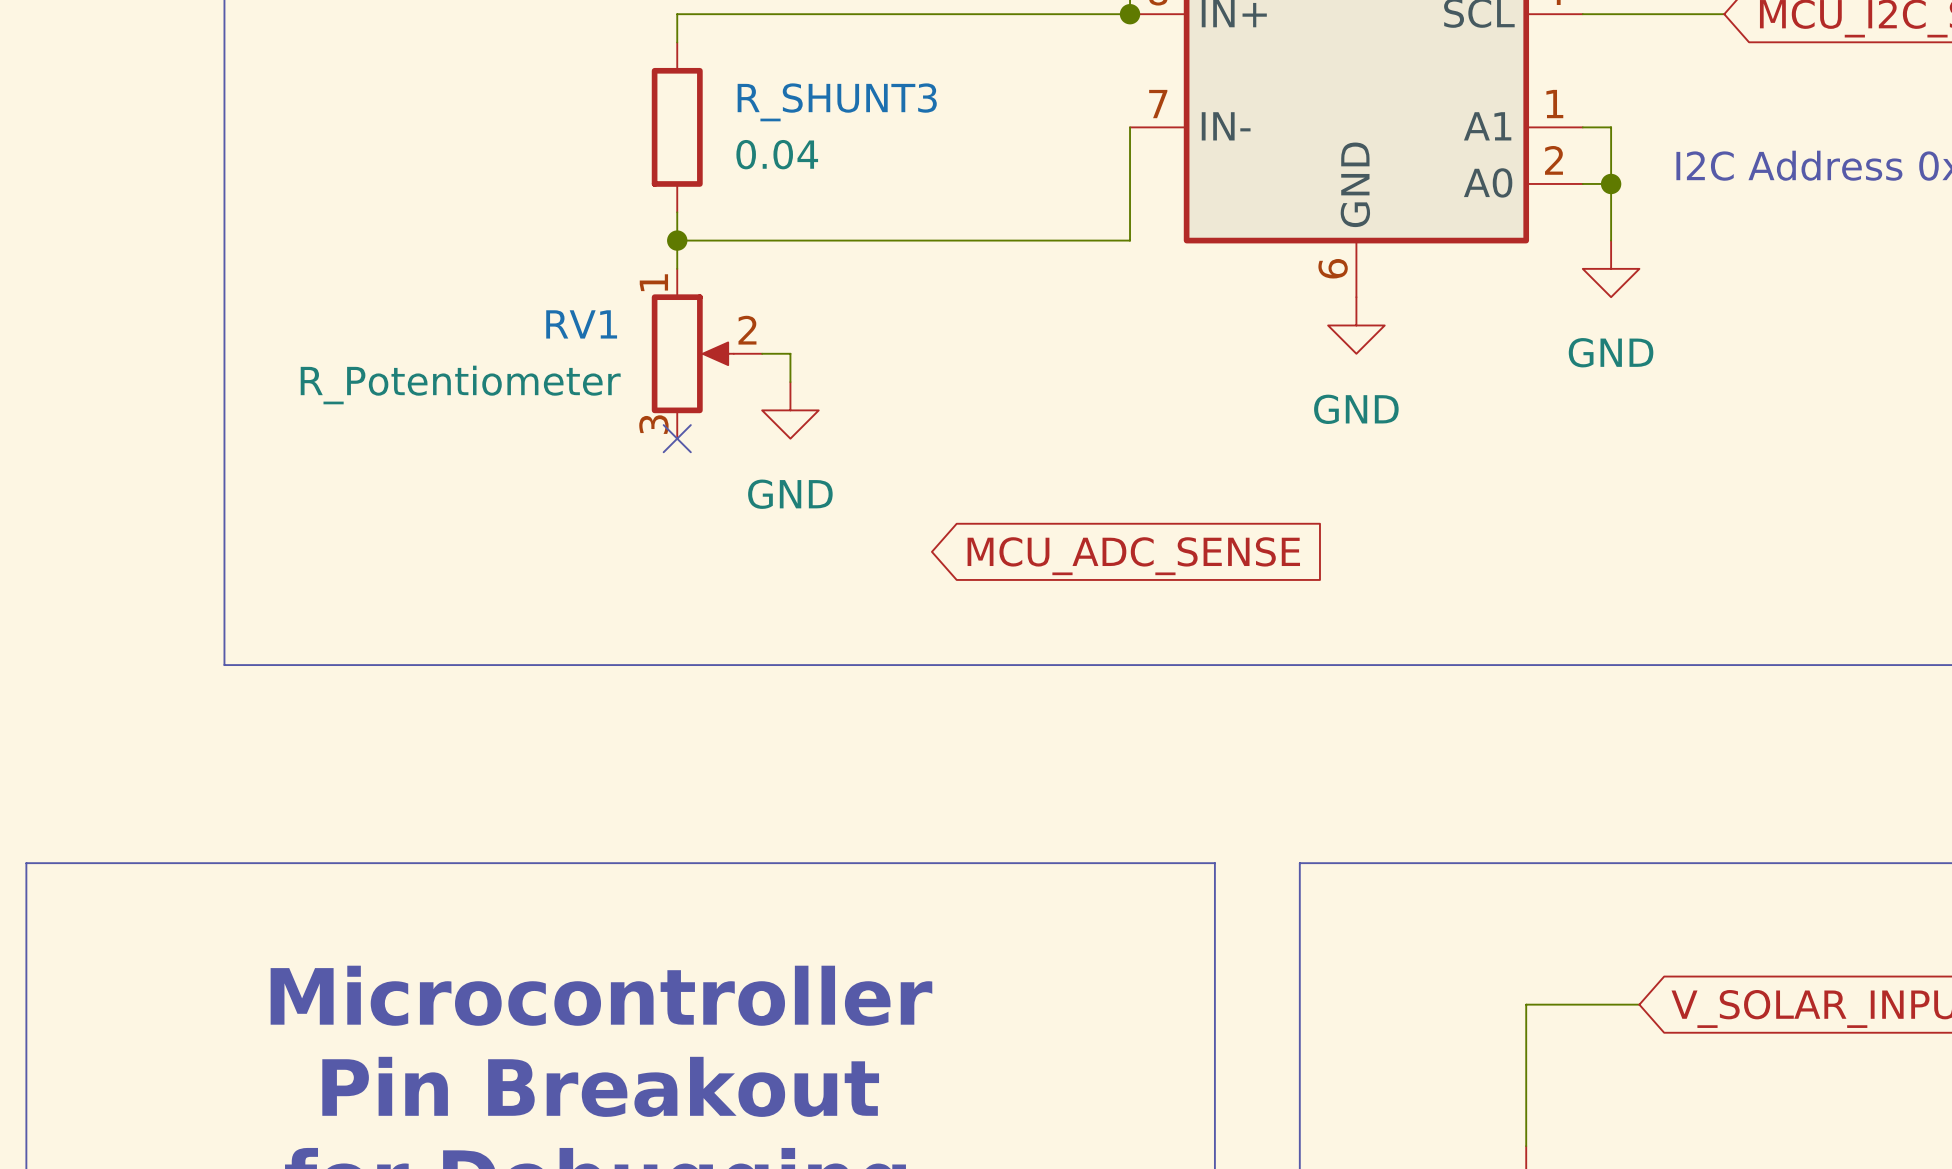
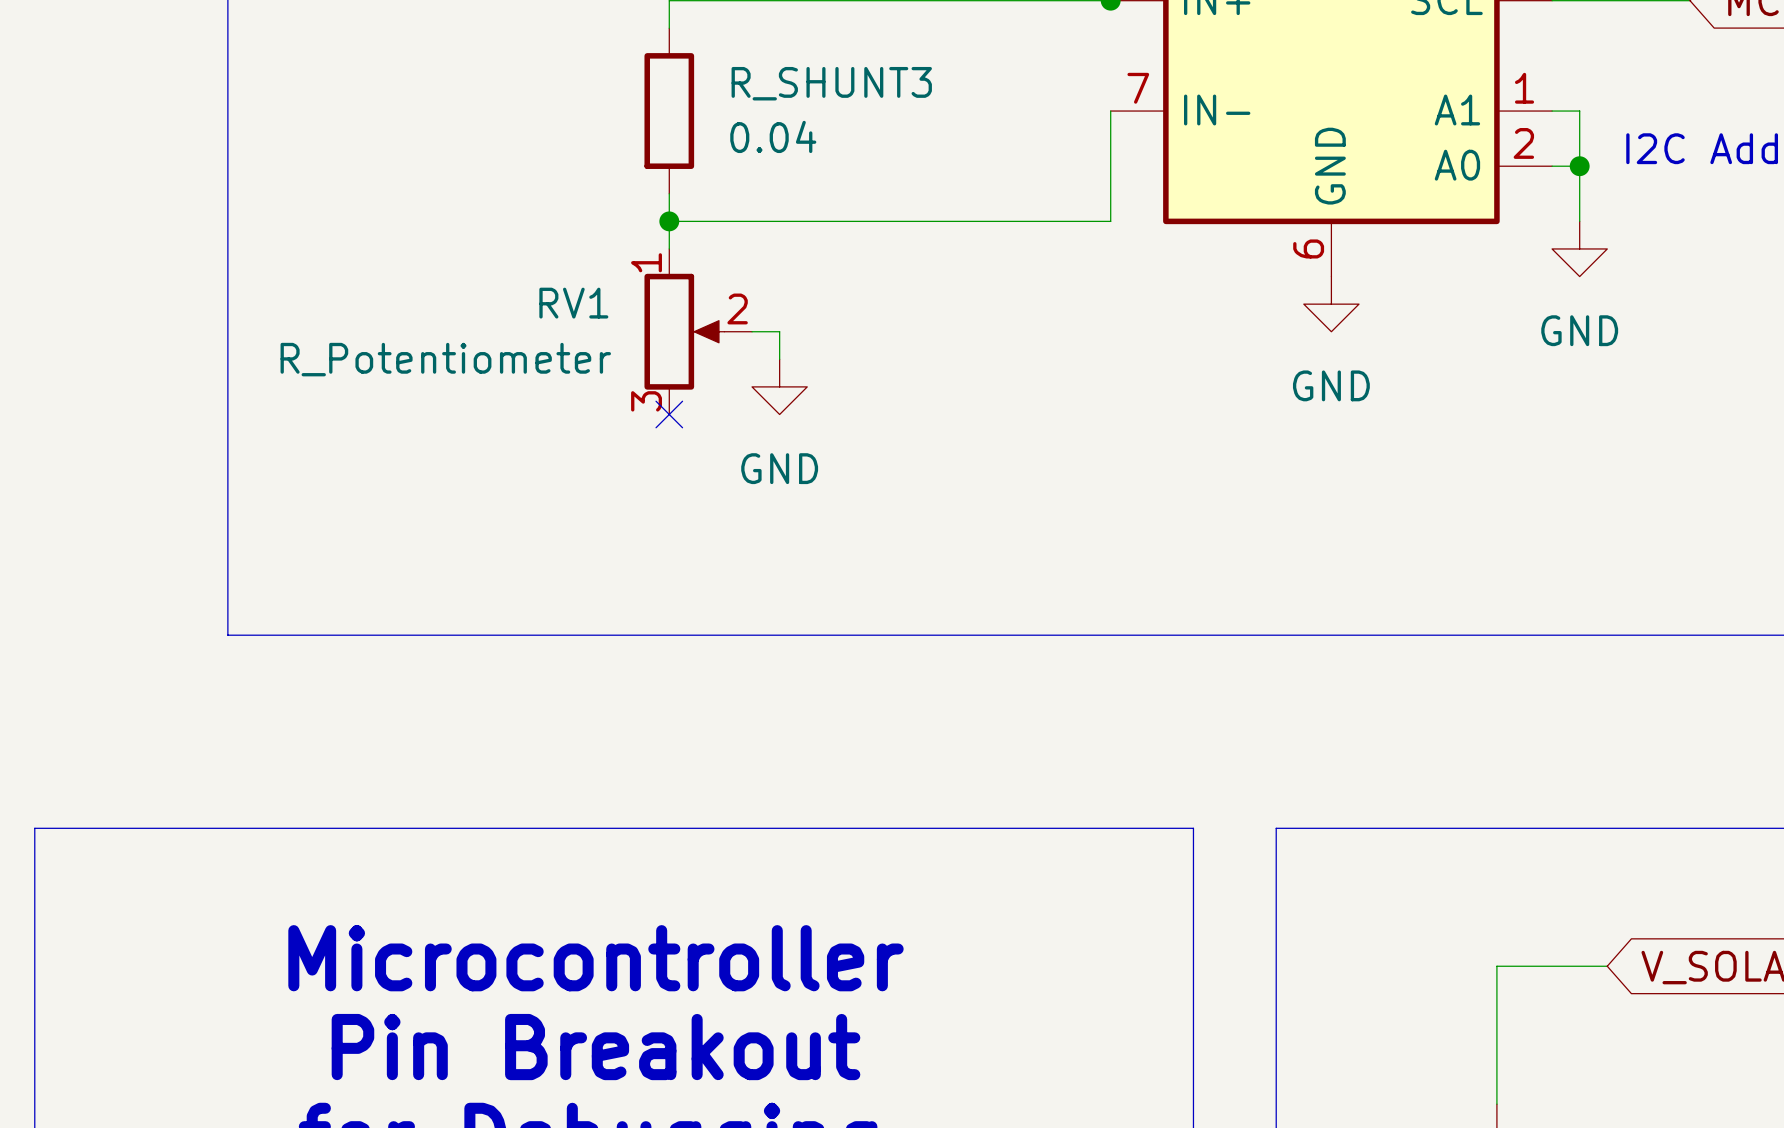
global label: MCU_ADC_SENSE (1133, 556) -> none

